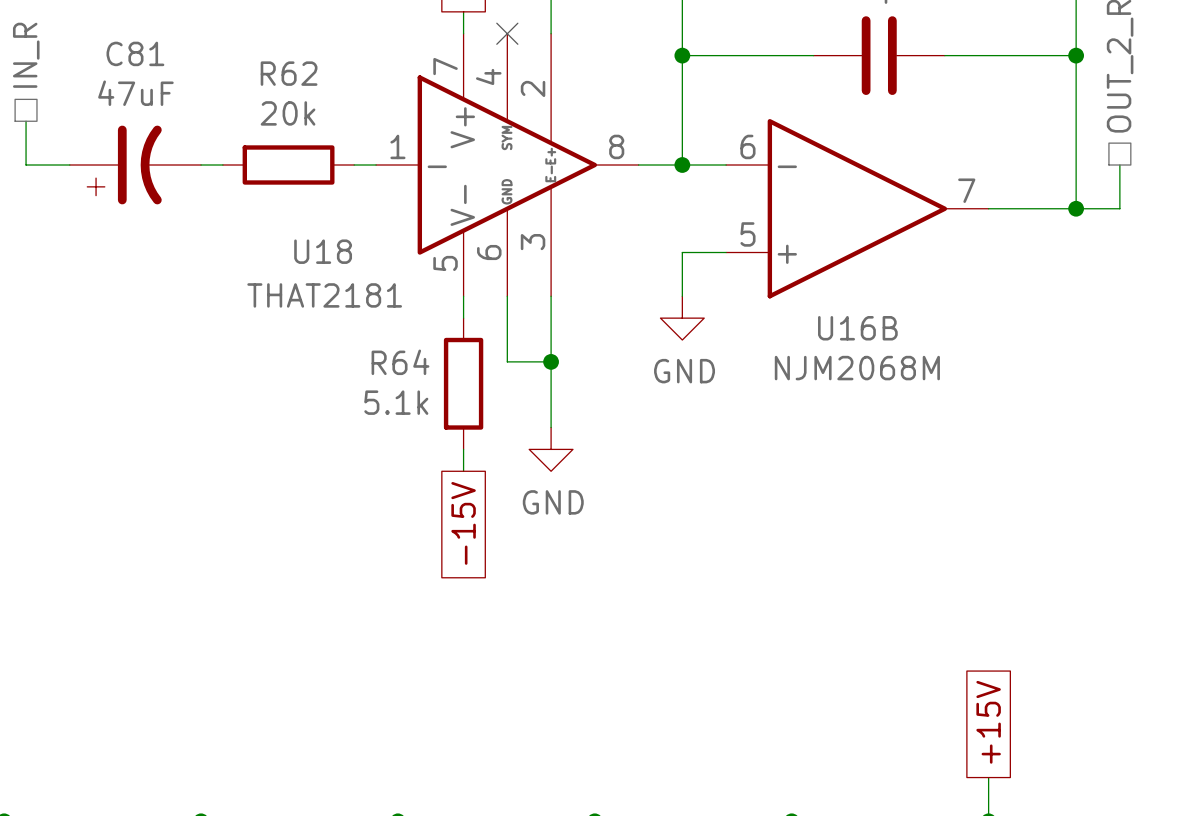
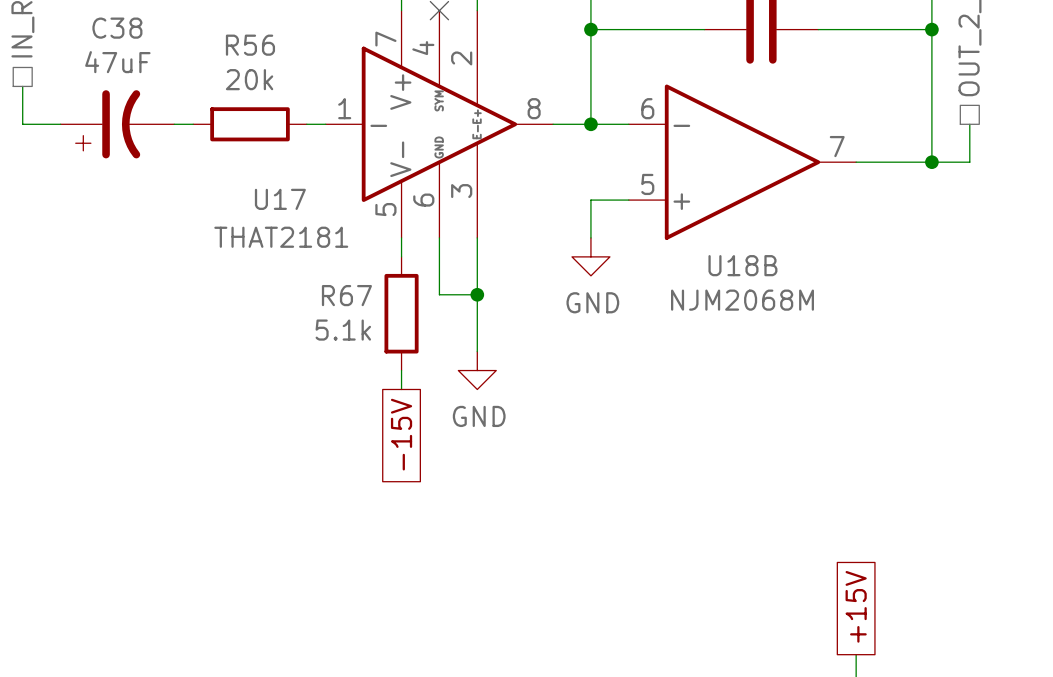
C81 name: C81 (135, 53) -> C38 (117, 28)
R62 name: R62 (289, 73) -> R56 (250, 45)
U18 name: U18 (323, 251) -> U17 (280, 199)
U16B name: U16B (857, 328) -> U18B (742, 265)
R64 name: R64 (400, 362) -> R67 (346, 295)

